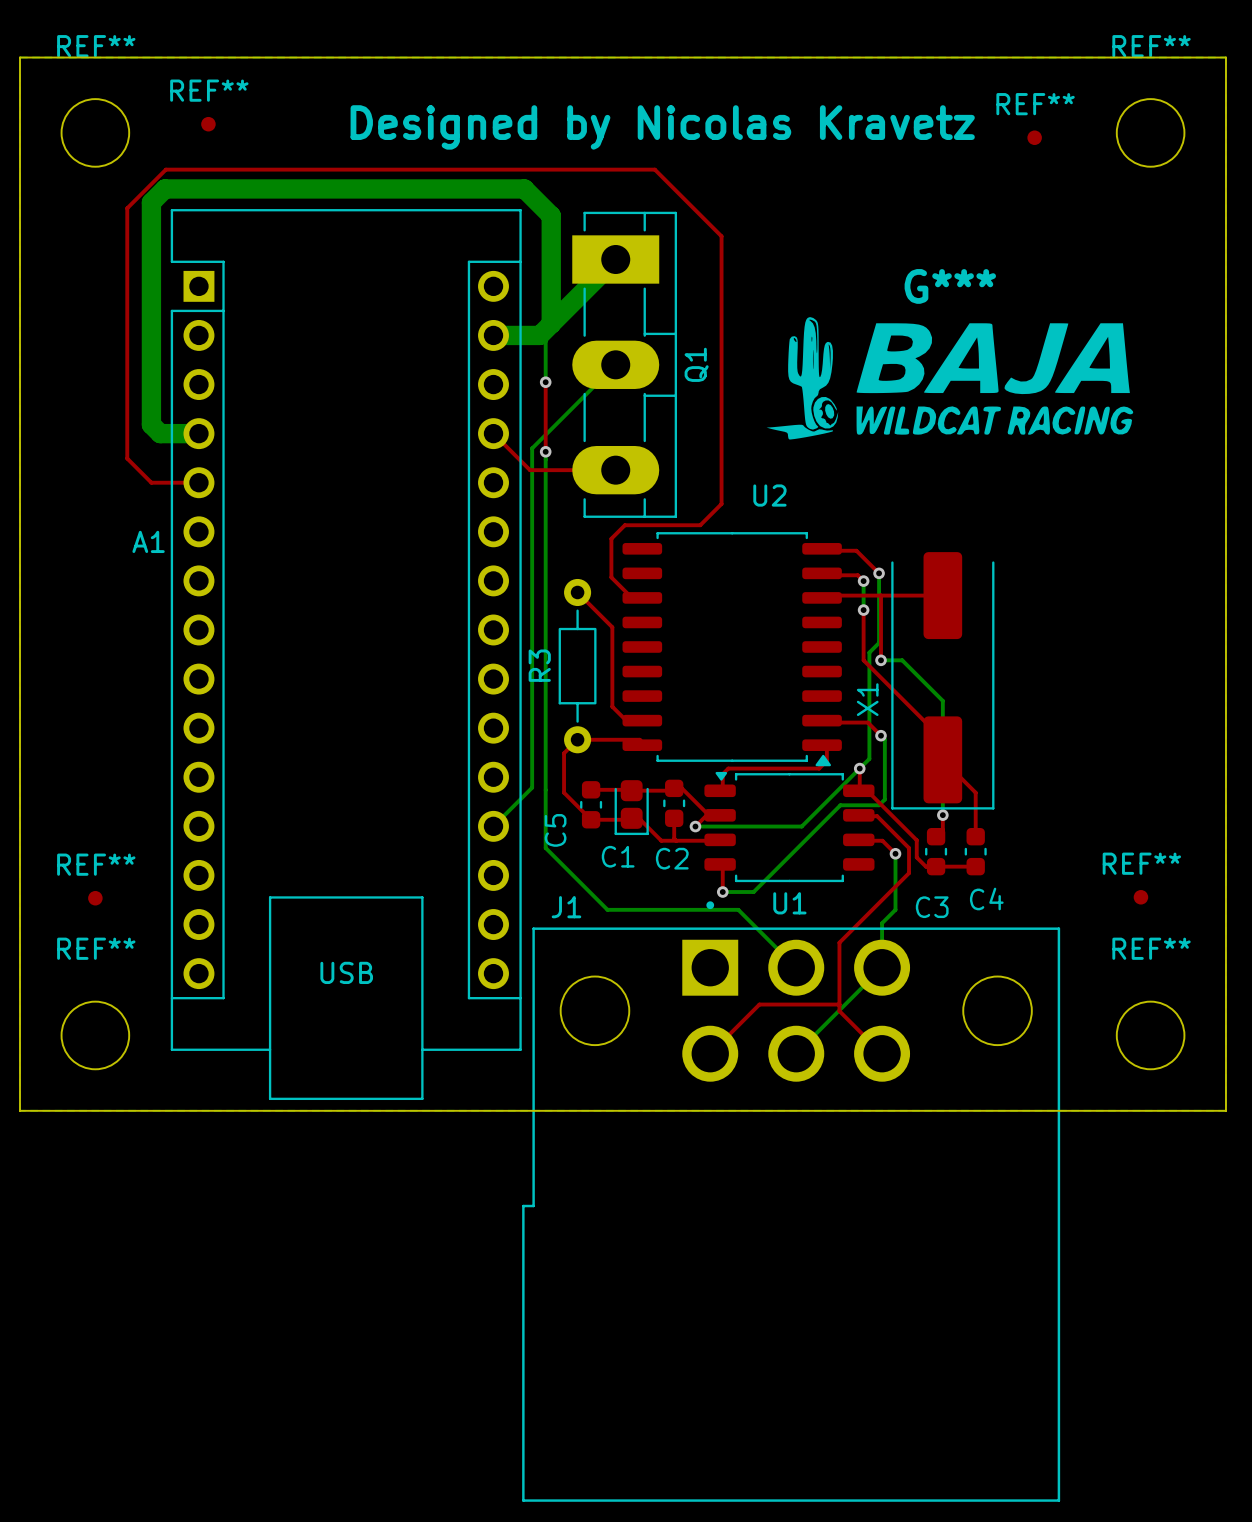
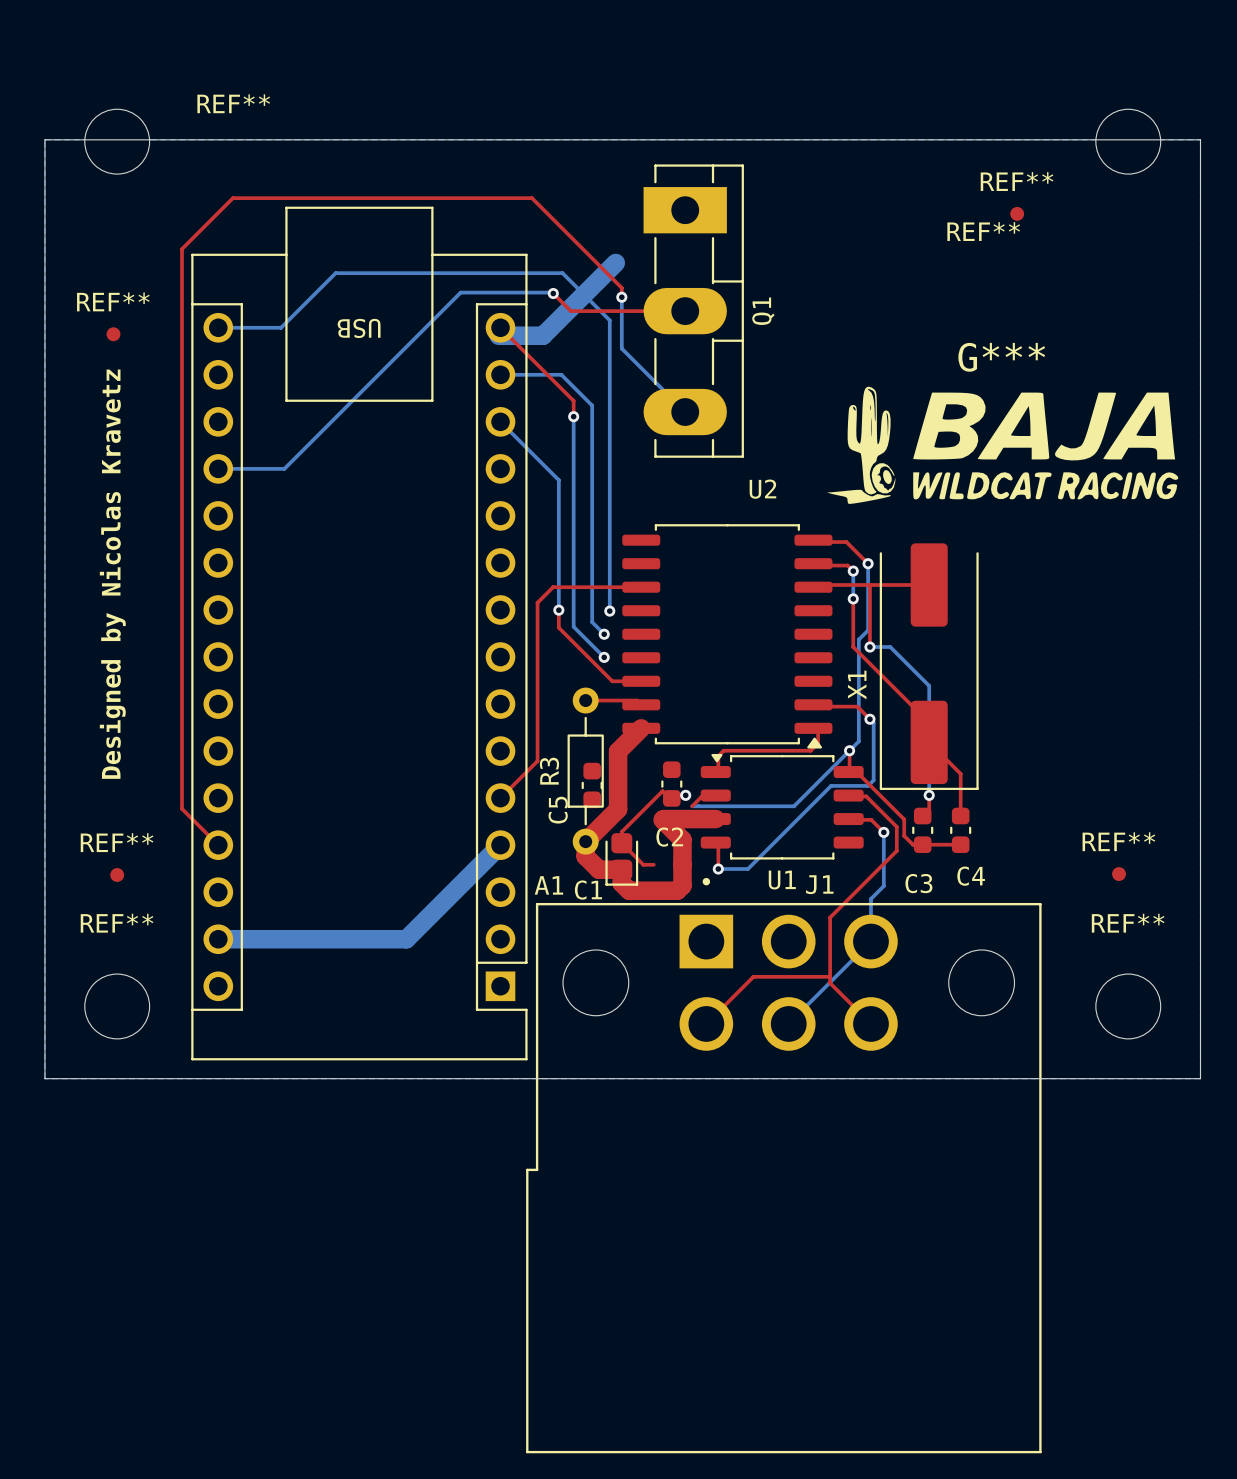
REF** name position: REF** (96, 46) -> REF** (233, 103)
REF** name position: REF** (1151, 46) -> REF** (983, 231)
REF** position: (208, 124) -> (113, 334)
text: Designed by Nicolas Kravetz (662, 127) -> none
board edge: (20, 130) (20, 57) (1225, 57) (1225, 130) -> (44, 139) (1200, 139)
REF** position: (1034, 137) -> (1017, 213)
top track: none -> (553, 293) (570, 311) (685, 311)
bottom track: none -> (553, 293) (460, 292) (284, 468) (218, 468)
via: none -> (553, 293)
top track: none -> (621, 297) (621, 287) (532, 198) (232, 198) (182, 249) (182, 808) (218, 845)
bottom track: none -> (621, 297) (621, 348) (685, 412)
via: none -> (621, 297)
bottom track: (551, 324) (551, 215) (524, 188) (164, 188) (151, 202) (151, 424) (160, 433) (198, 433) -> none
bottom track: none -> (218, 327) (281, 327) (335, 273) (562, 273) (609, 320) (609, 611)
top track: none -> (500, 327) (573, 400) (573, 416)
bottom track: (539, 335) (545, 341) (545, 382) -> none
bottom track: (615, 364) (532, 448) (532, 787) (493, 826) -> none
Q1 position: (624, 364) -> (693, 311)
bottom track: none -> (500, 374) (561, 374) (592, 405) (592, 622) (604, 634)
G*** position: (949, 378) -> (1002, 445)
top track: (545, 382) (545, 451) -> none
via: (545, 382) -> none
bottom track: none -> (573, 416) (573, 626) (604, 657)
via: none -> (573, 416)
bottom track: none -> (500, 421) (558, 480) (558, 610)
top track: (493, 433) (530, 470) (615, 470) -> none
bottom track: (545, 451) (545, 847) (607, 909) (738, 909) (796, 967) -> none
via: (545, 451) -> none
top track: (198, 482) (151, 482) (127, 458) (127, 208) (165, 169) (654, 169) (721, 236) (721, 503) (700, 525) (624, 525) (611, 538) (611, 577) (631, 597) -> (500, 798) (537, 761) (537, 602) (553, 587) (631, 587)
A1 name position: A1 (148, 541) -> A1 (548, 885)
text: none -> Designed by Nicolas Kravetz (112, 574)
top track: (577, 592) (612, 627) (612, 706) (628, 722) (647, 722) -> none
top track: none -> (558, 610) (558, 627) (612, 681) (641, 681)
via: none -> (558, 610)
via: none -> (609, 611)
via: none -> (604, 634)
A1 rotation: 0° (346, 654) -> 180° (359, 633)
R3 position: (577, 666) -> (585, 771)
via: none -> (604, 657)
top track: none -> (585, 700) (636, 700) (641, 704)
top track: none -> (641, 728) (618, 751) (618, 809) (585, 841) (585, 856) (598, 869) (621, 869) (621, 883) (629, 890) (677, 890) (682, 885) (682, 839) (662, 819) (715, 819)
top track: (647, 747) (639, 739) (577, 739) (564, 753) (564, 792) (591, 819) (640, 819) (661, 840) (722, 840) -> none
top track: (591, 789) (679, 790) (681, 788) (709, 816) -> none
C1 position: (631, 807) -> (621, 859)
top track: none -> (685, 795) (666, 795) (662, 791) (621, 831) (621, 843) (643, 864) (653, 864)
top track: (674, 818) (674, 838) (676, 840) -> none
via position: (695, 826) -> (685, 795)
C1 name position: C1 (618, 856) -> C1 (588, 890)
bottom track: none -> (500, 845) (406, 939) (218, 939)
J1 name position: J1 (566, 907) -> J1 (819, 884)

